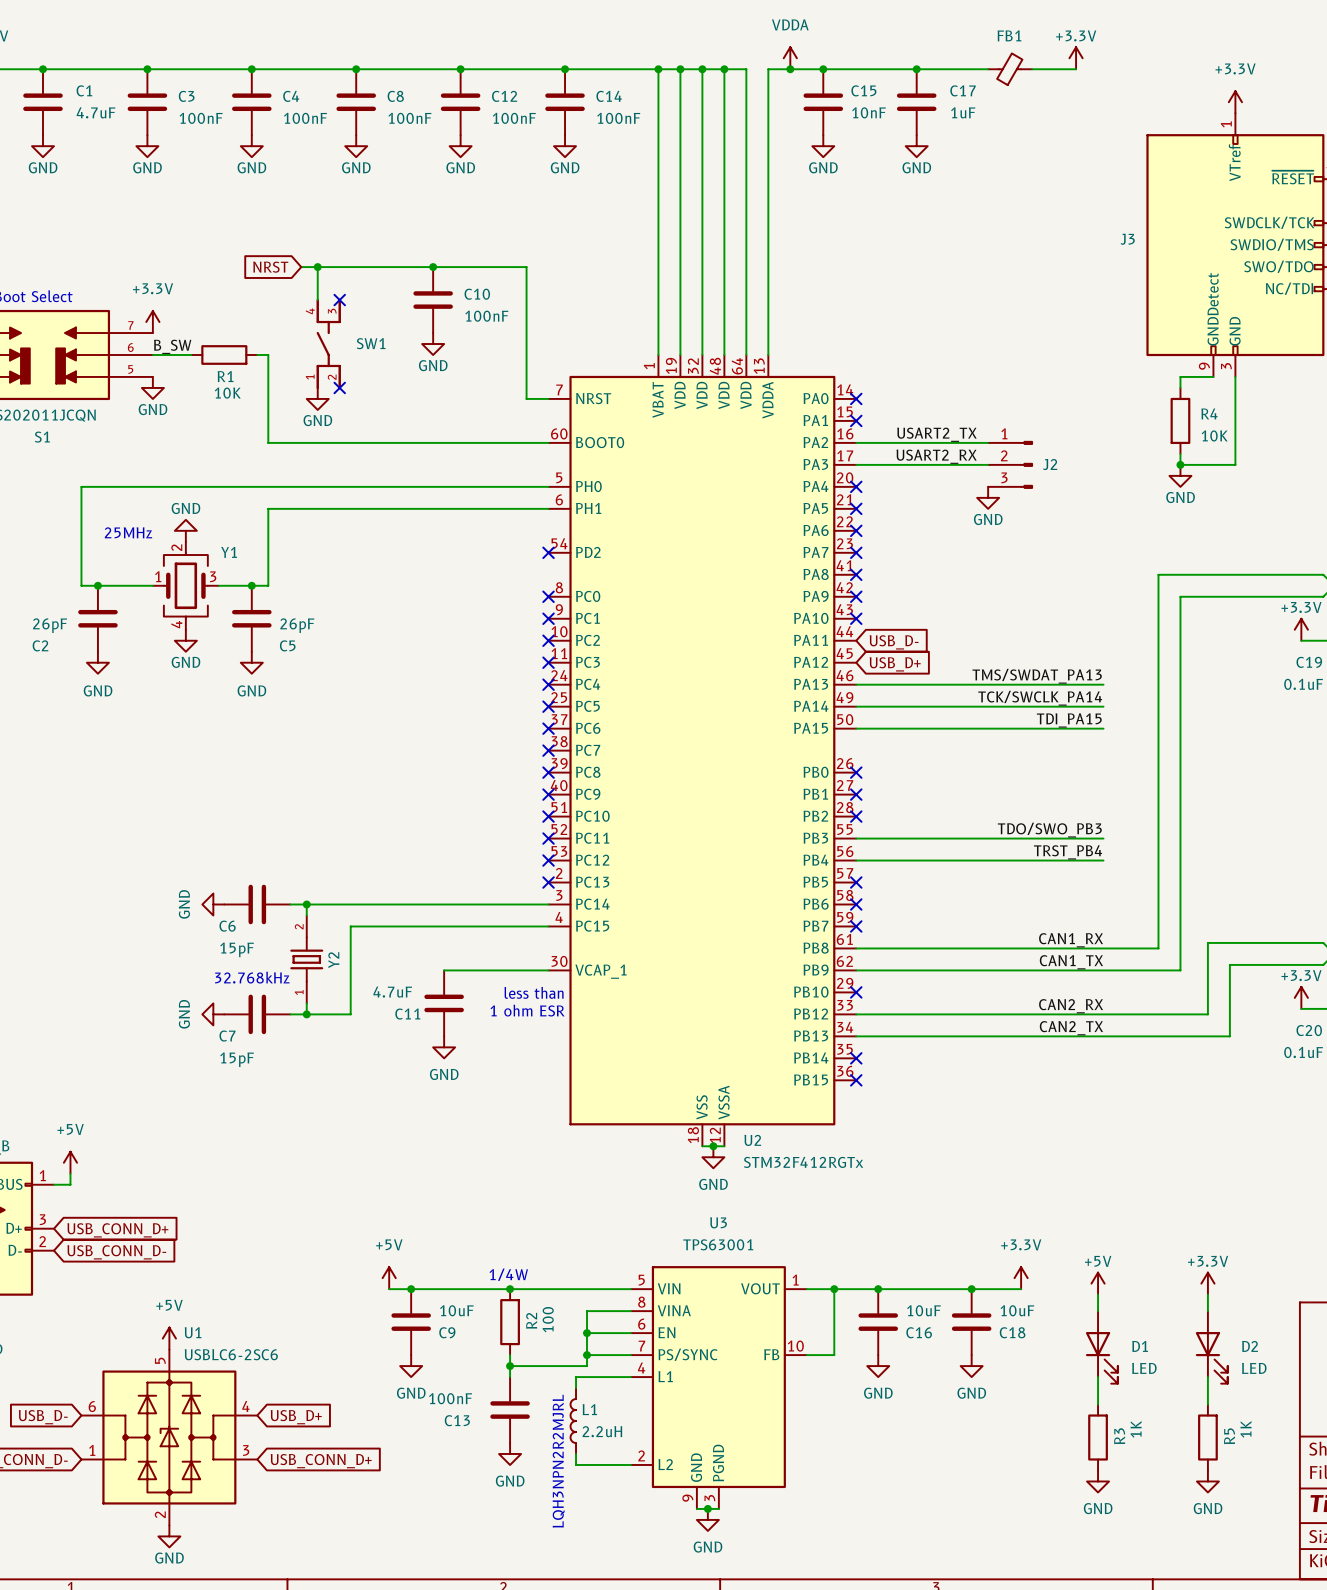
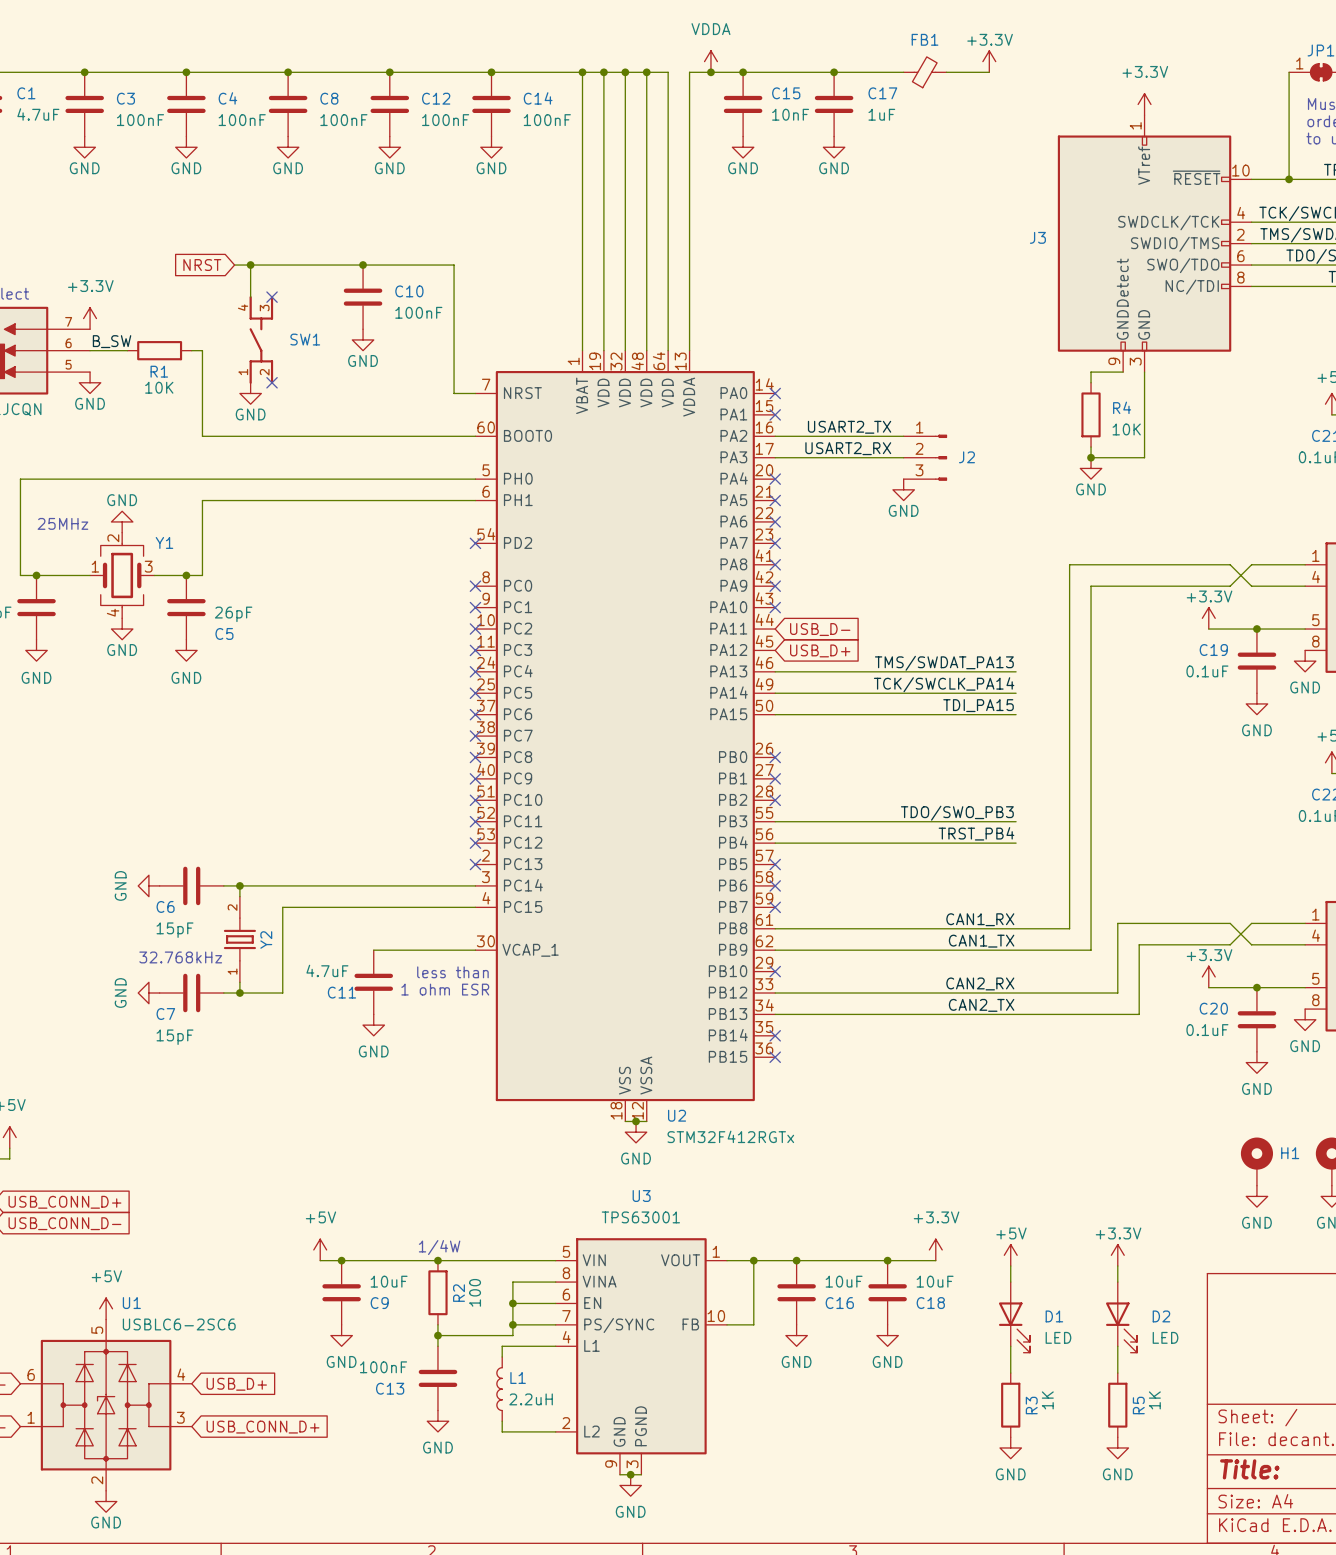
text: LQH3NPN2R2MJRL (558, 1461) -> none

